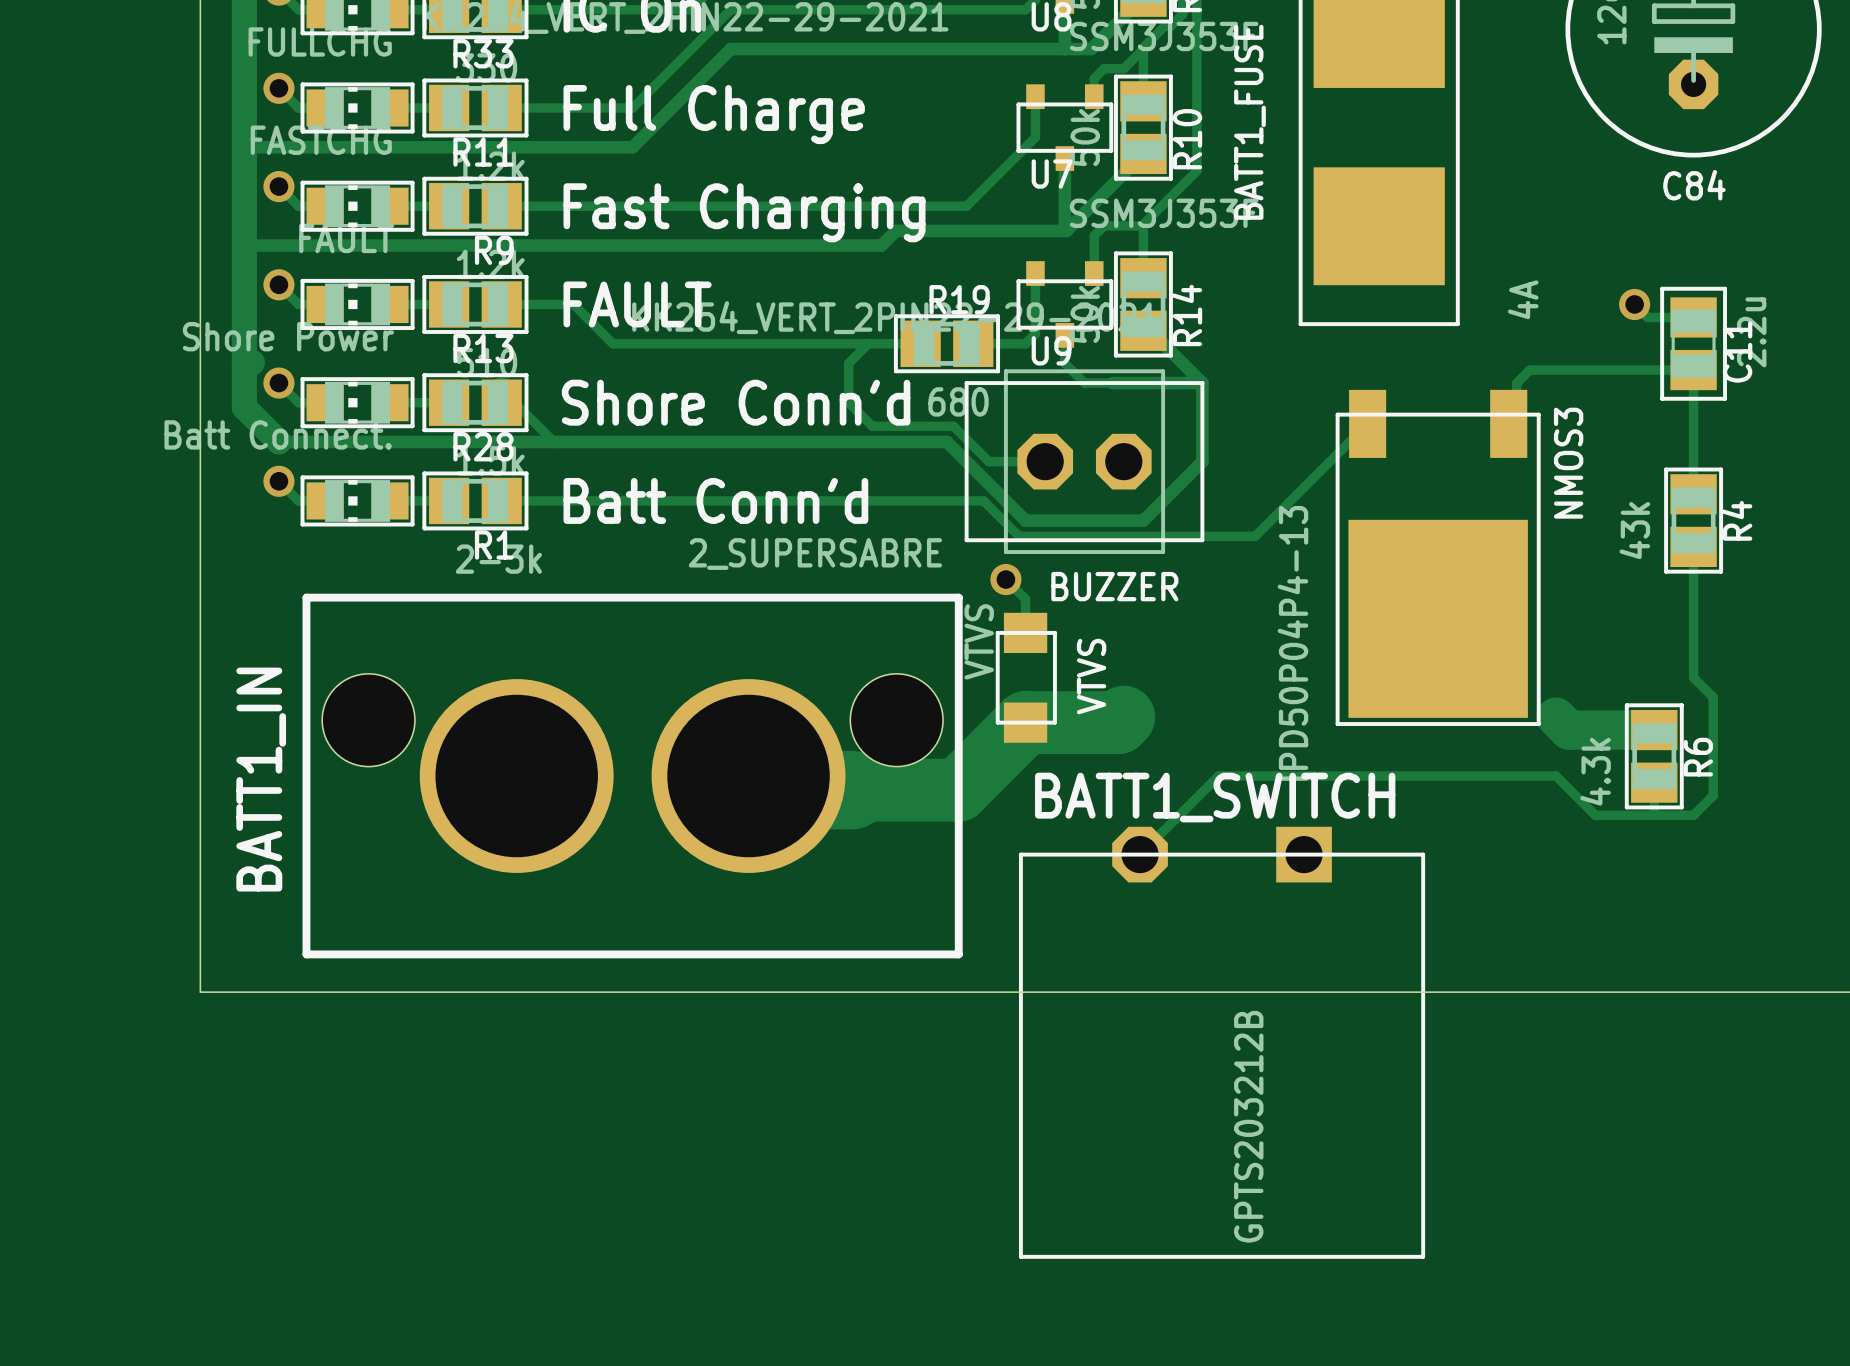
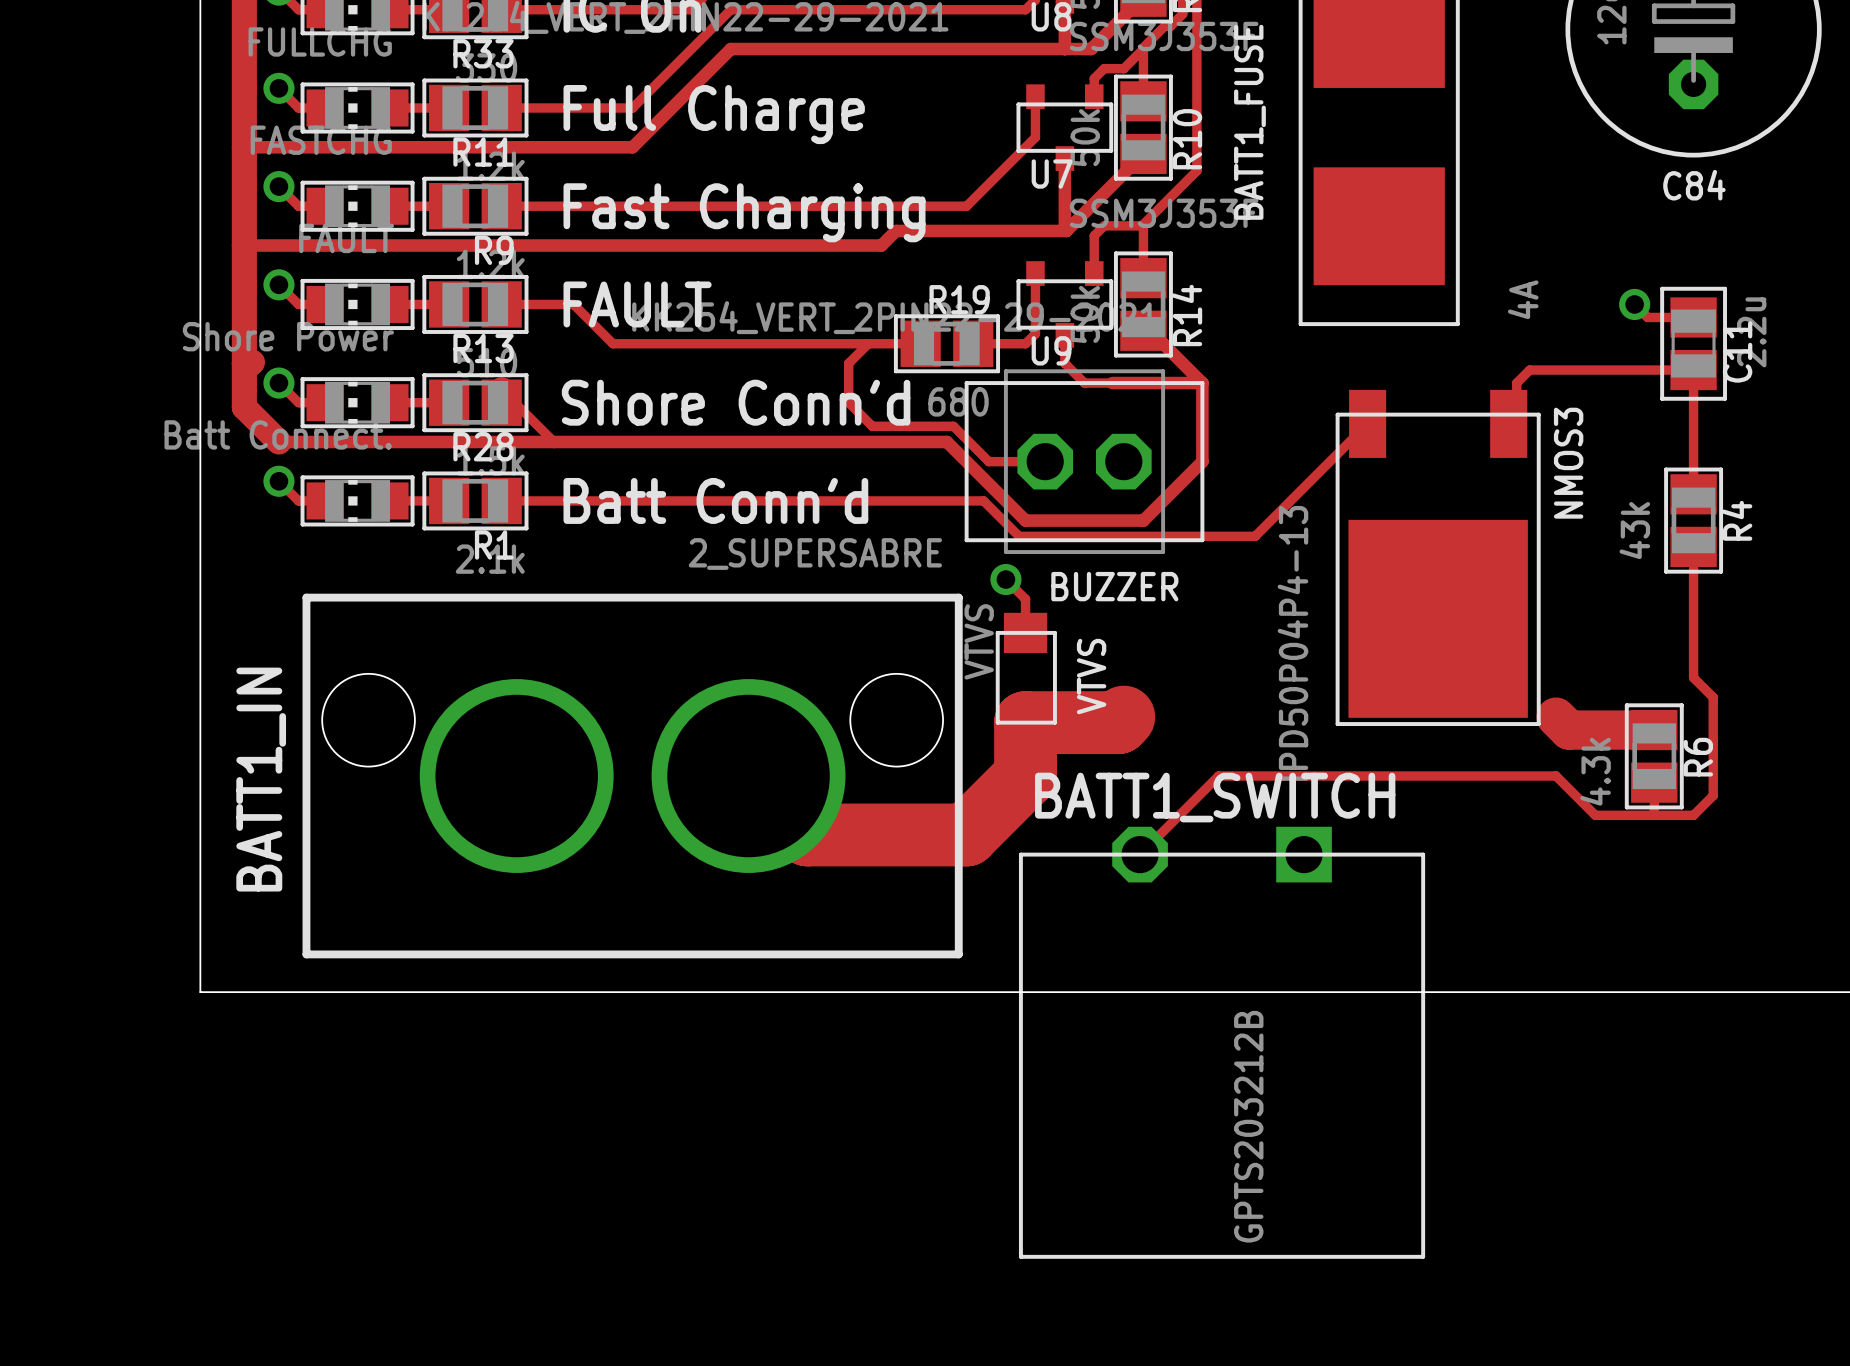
R1 value: 2-3k (498, 559) -> 2.1k (490, 559)
track: (1025, 722) (958, 790) (762, 790) -> (1025, 722) (1025, 776) (966, 834) (807, 834) (762, 790)

